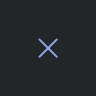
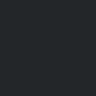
no-connect mark: (48, 48) -> none

